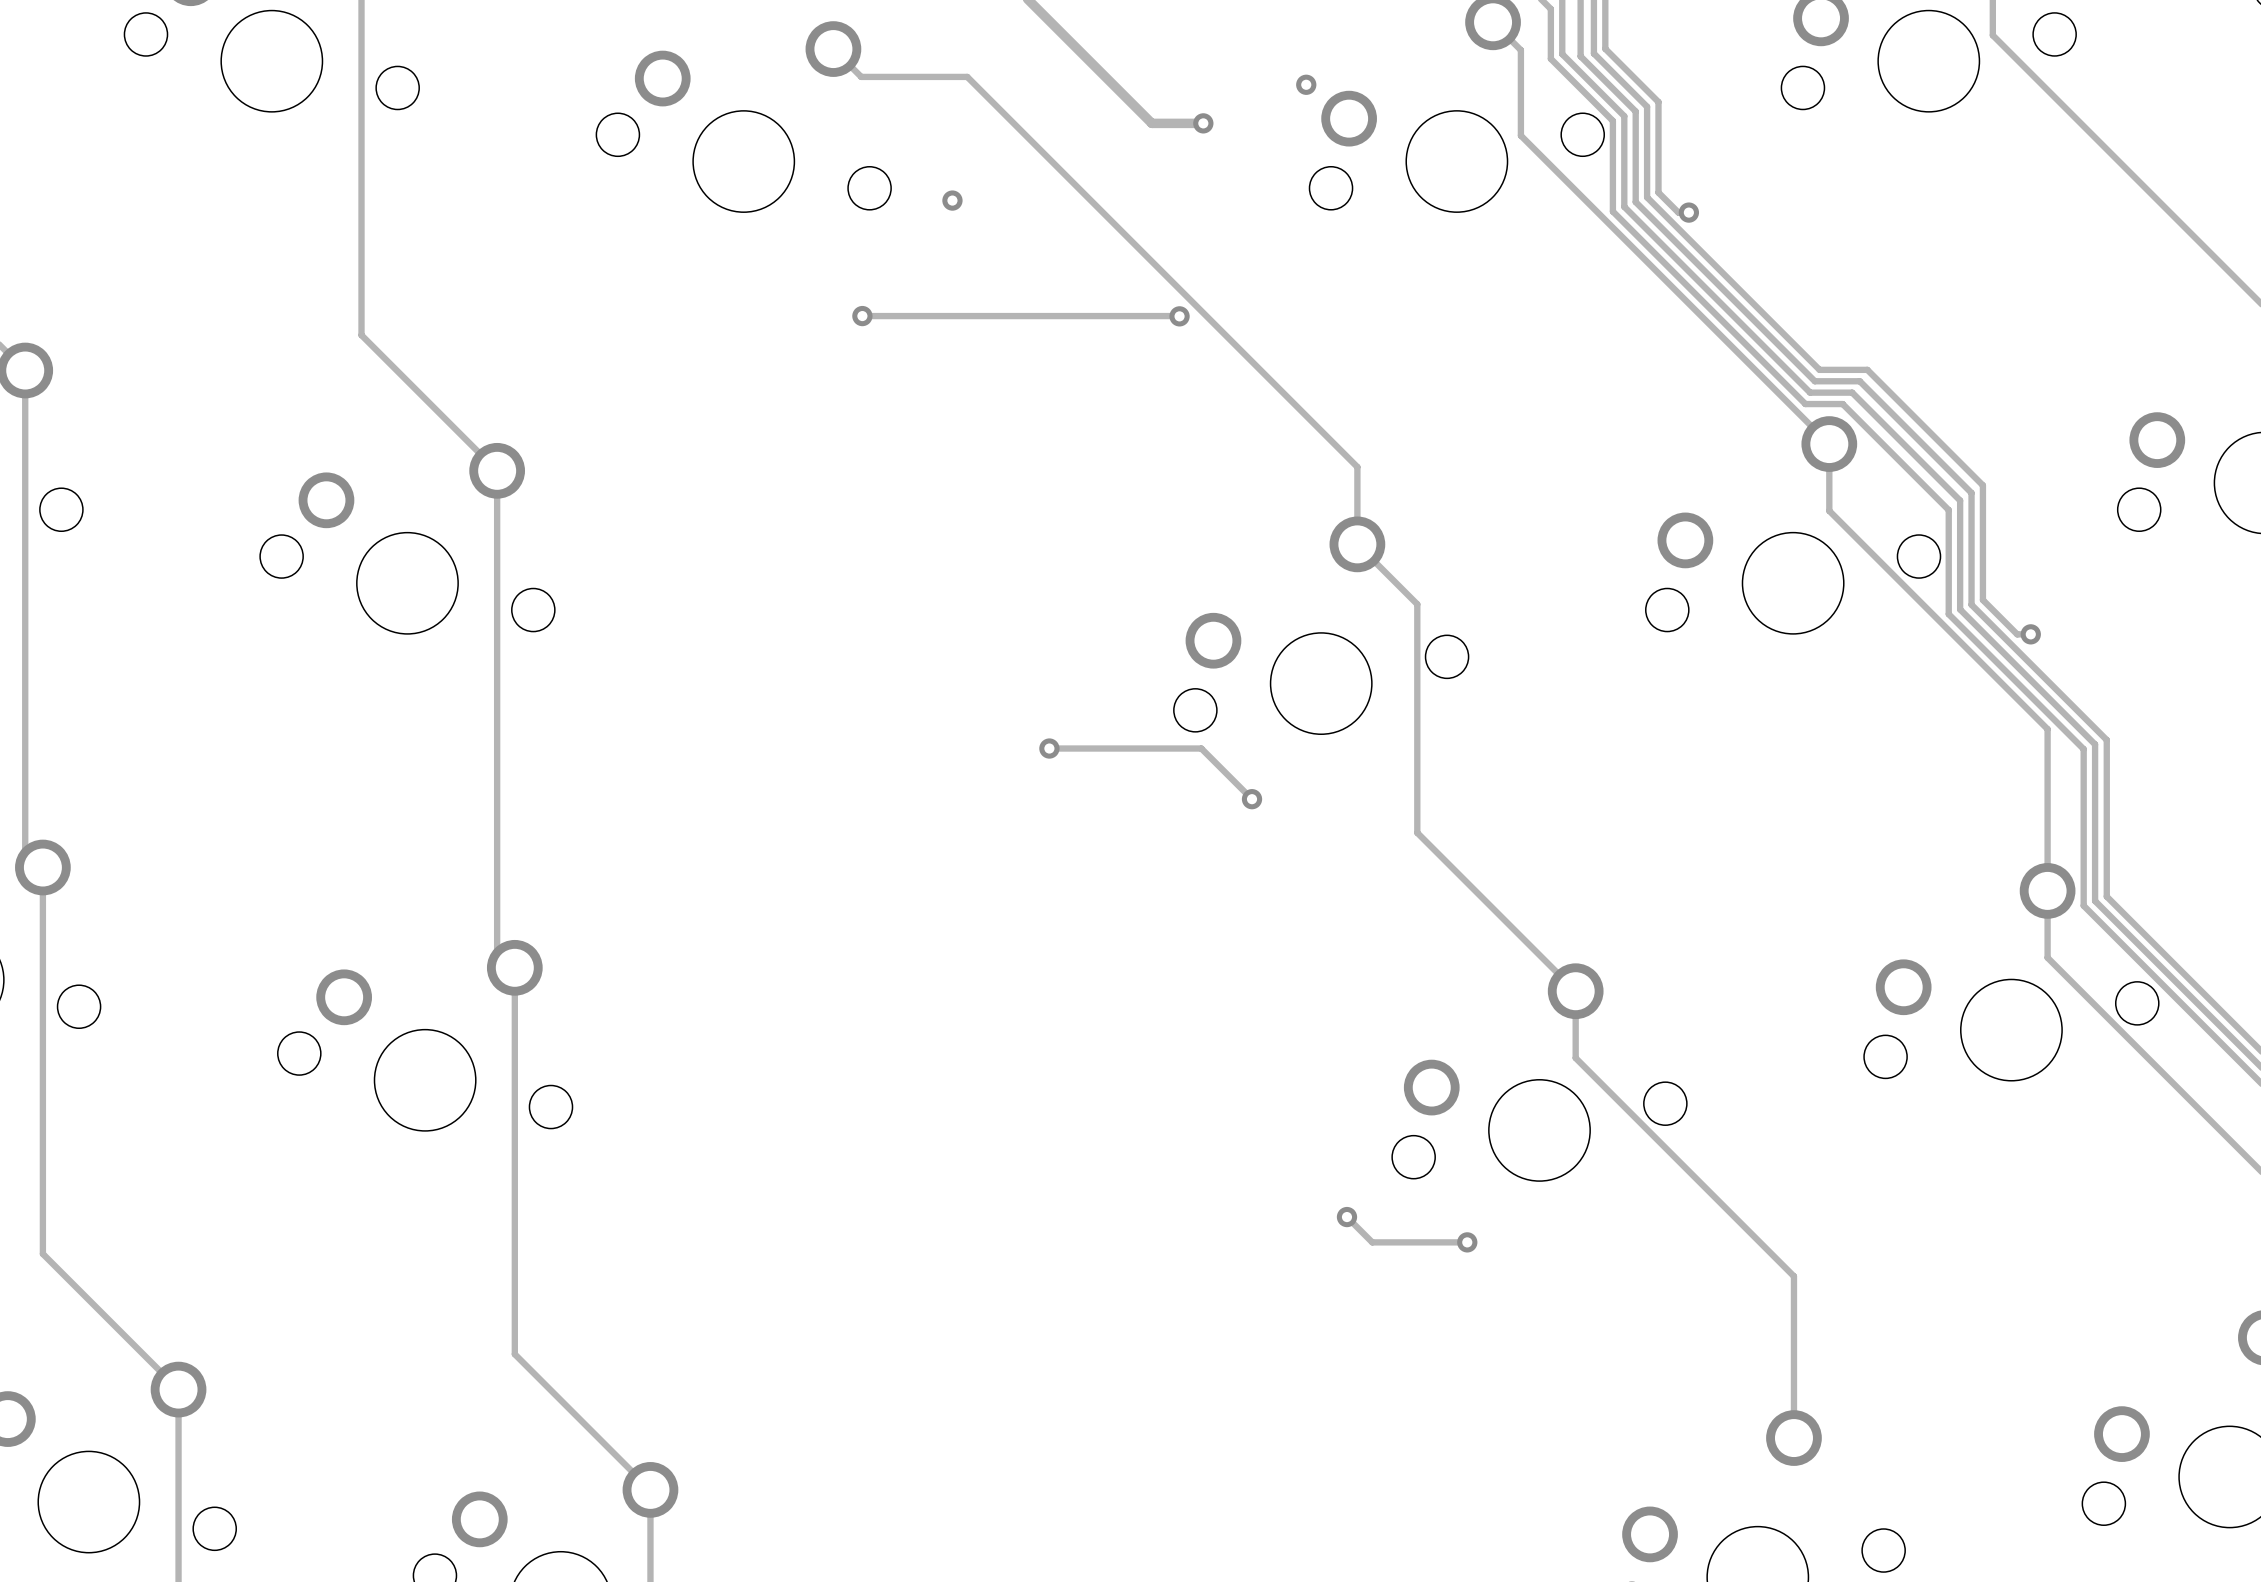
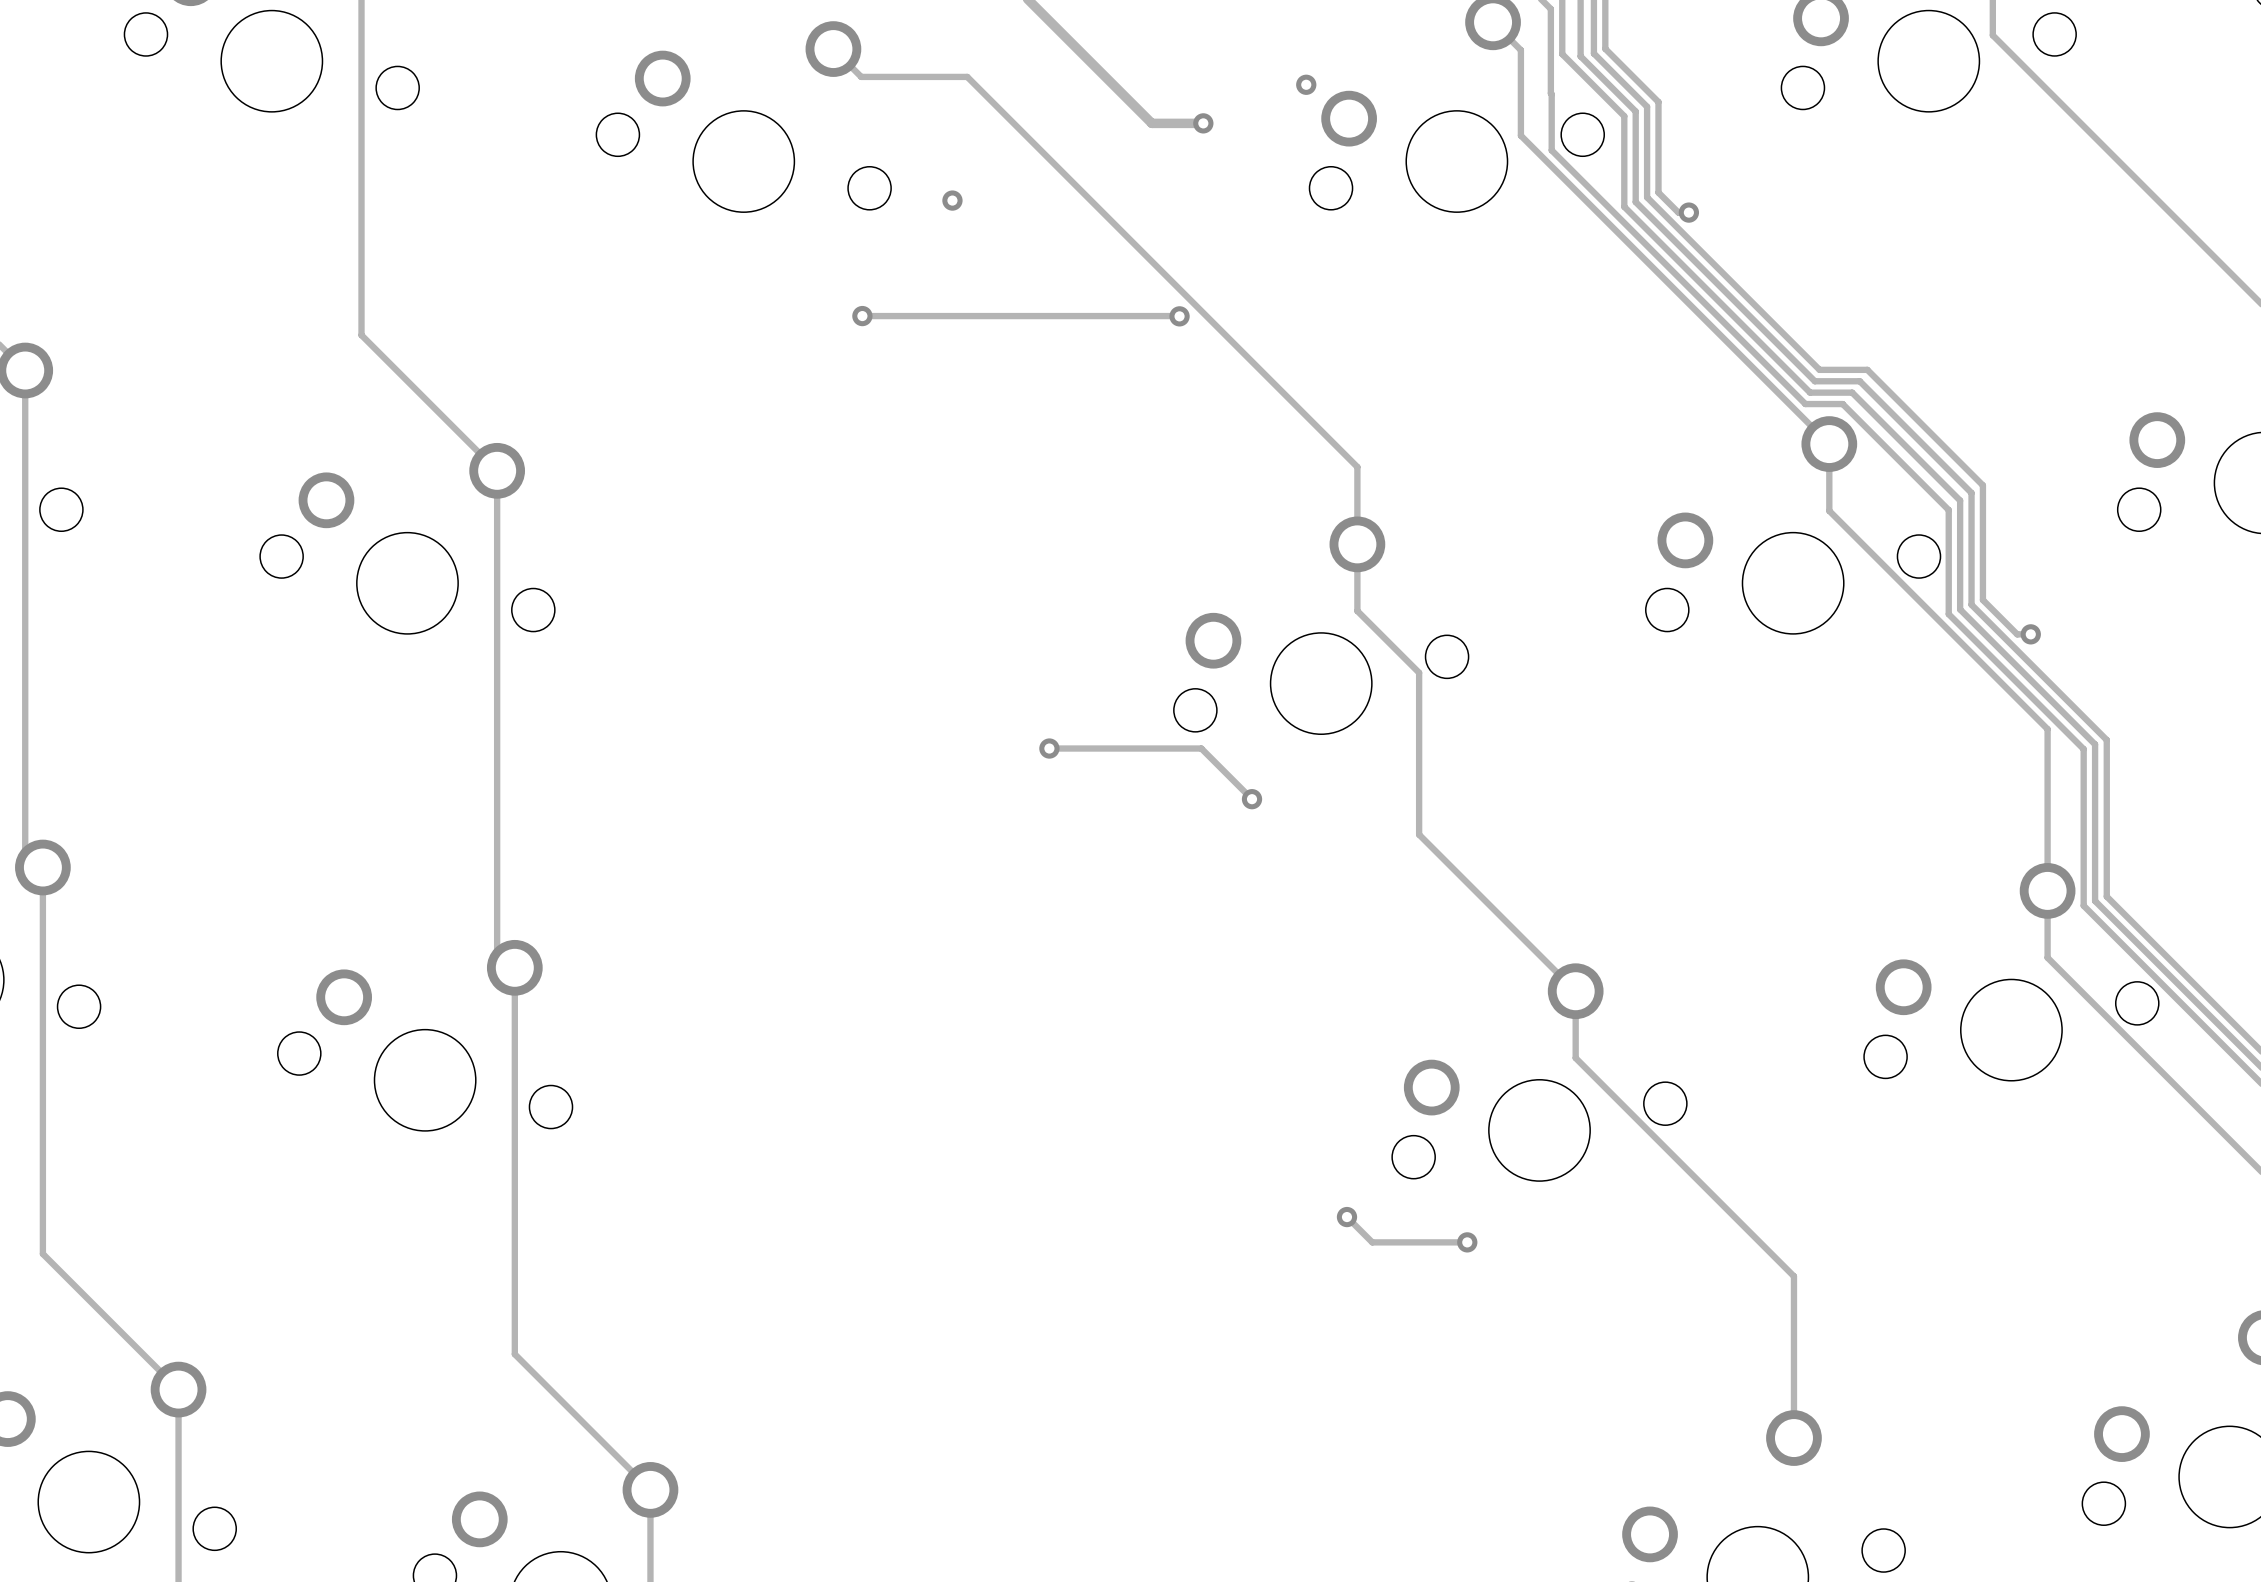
track: (1550, 58) (1612, 120) (1612, 211) -> (1550, 58) (1551, 150) (1612, 211)
track: (1357, 544) (1417, 604) (1417, 832) (1419, 834) -> (1357, 544) (1357, 611) (1419, 672) (1419, 834)

